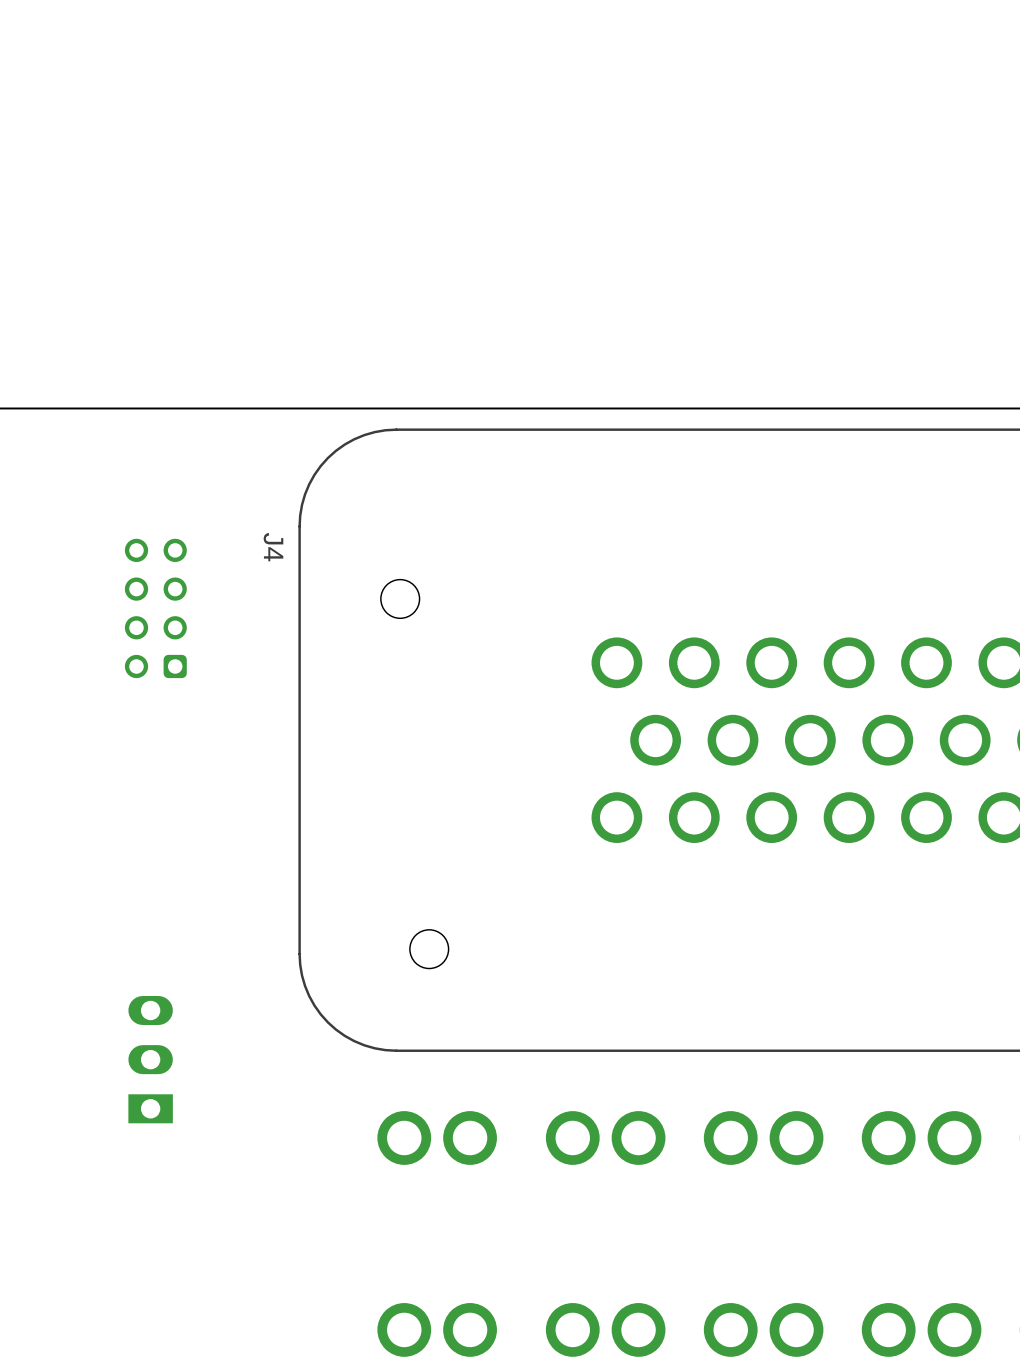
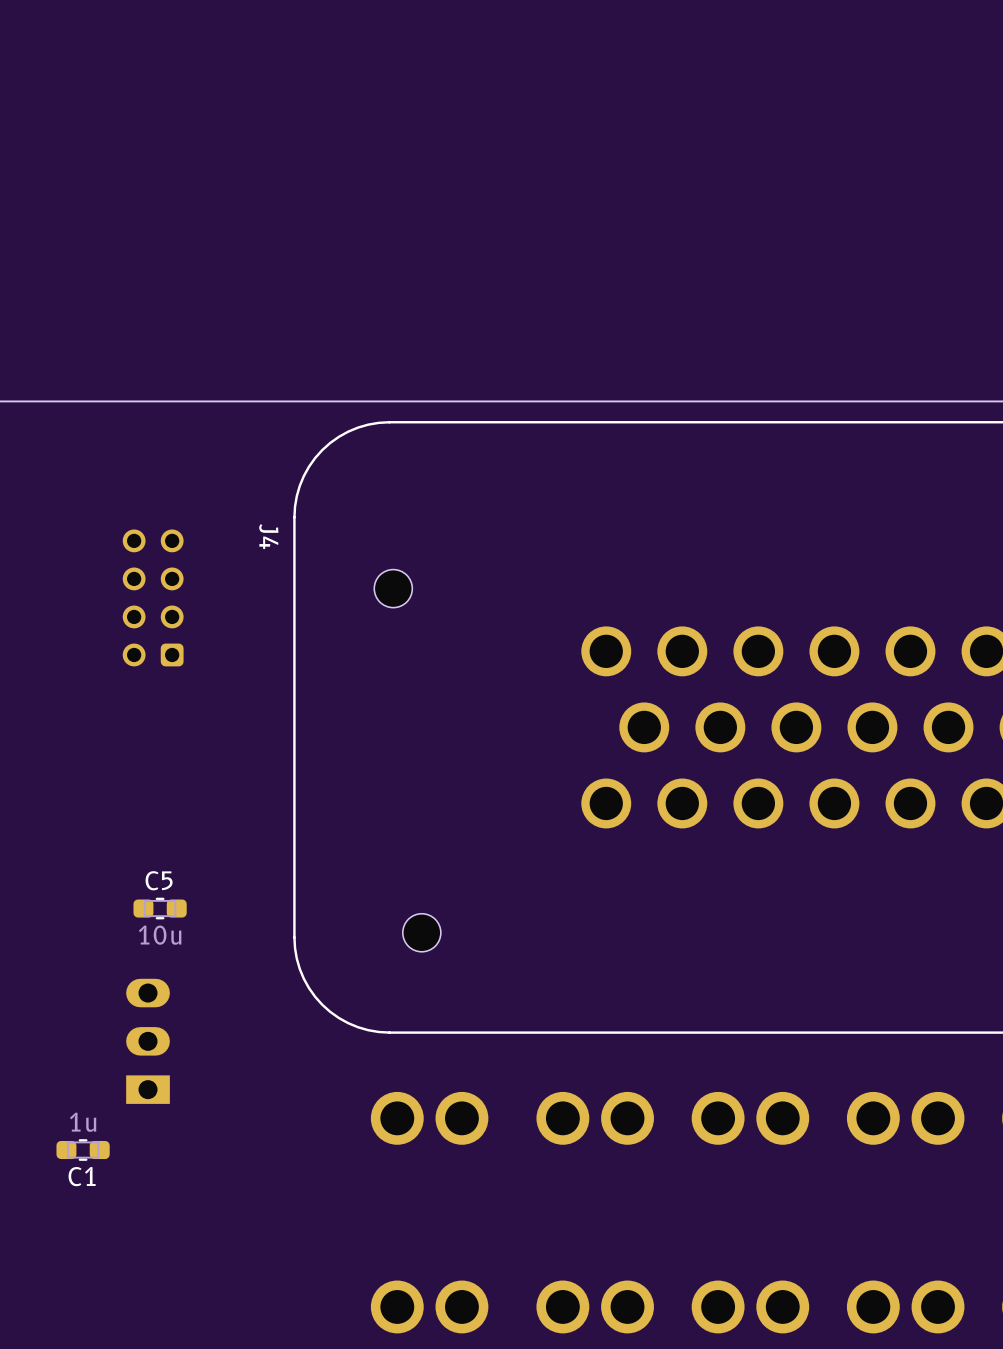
C5: none -> 10u (160, 908)
C1: none -> 1u (83, 1150)

